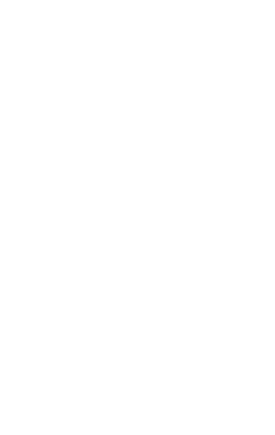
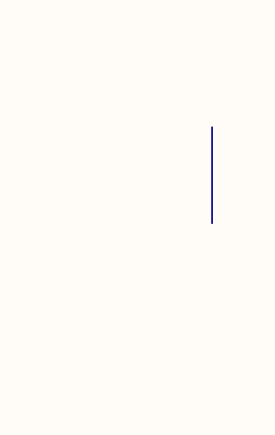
wire: none -> (212, 127) (212, 223)

